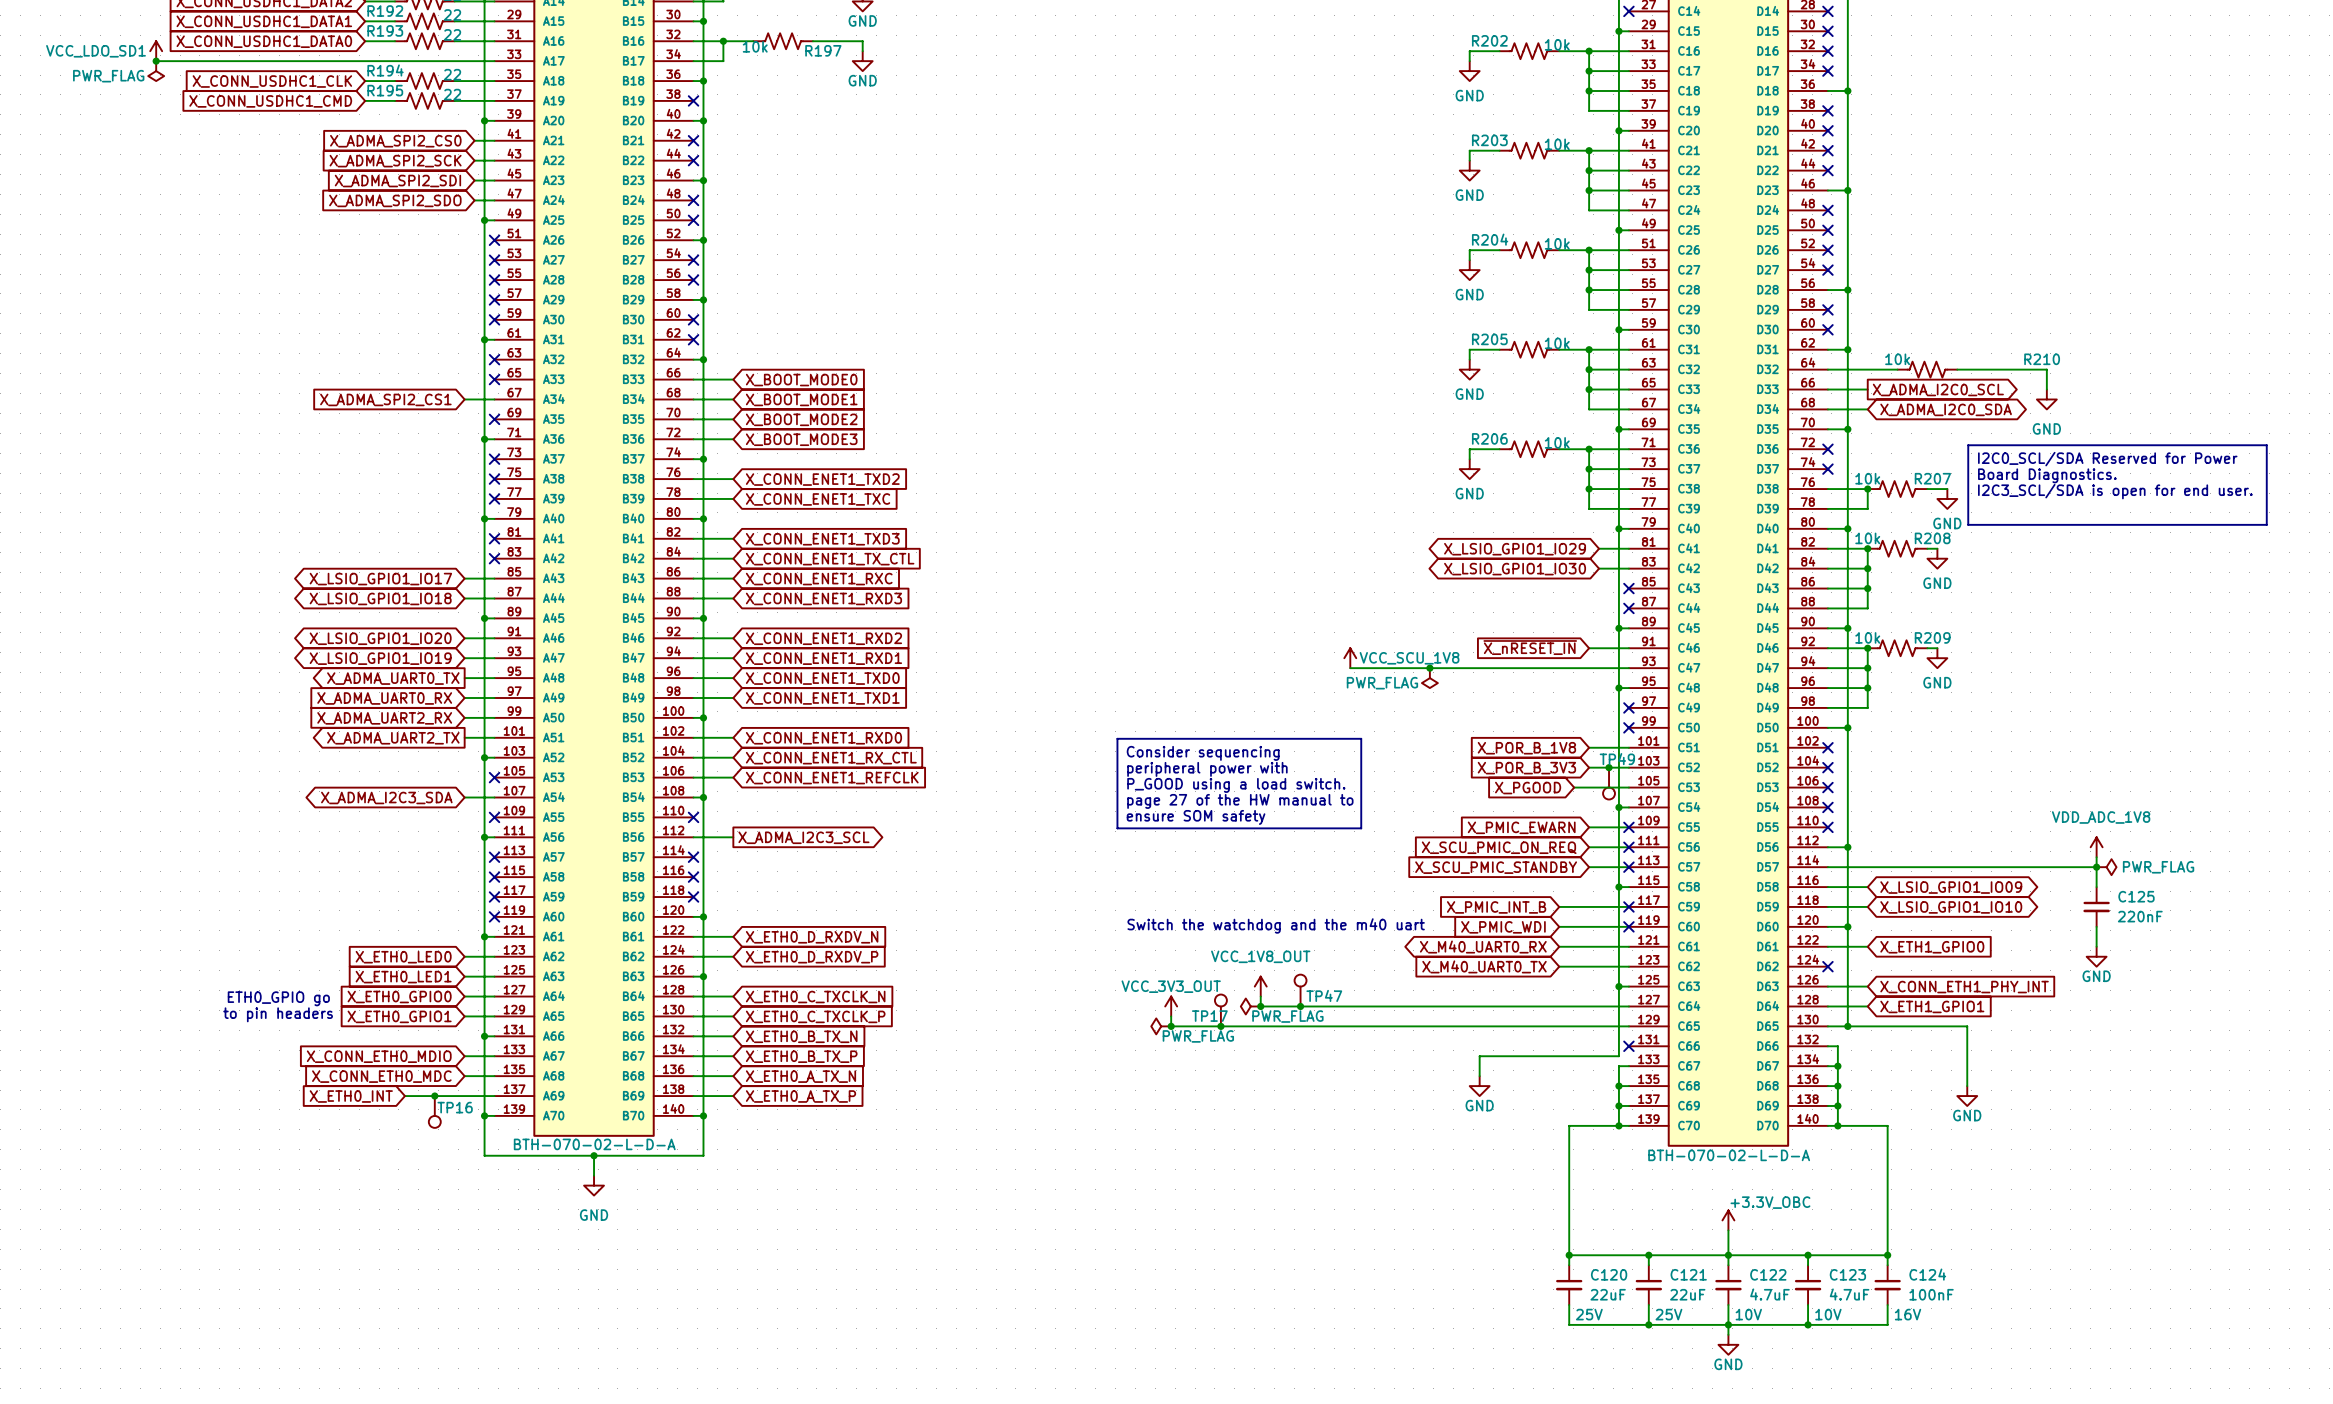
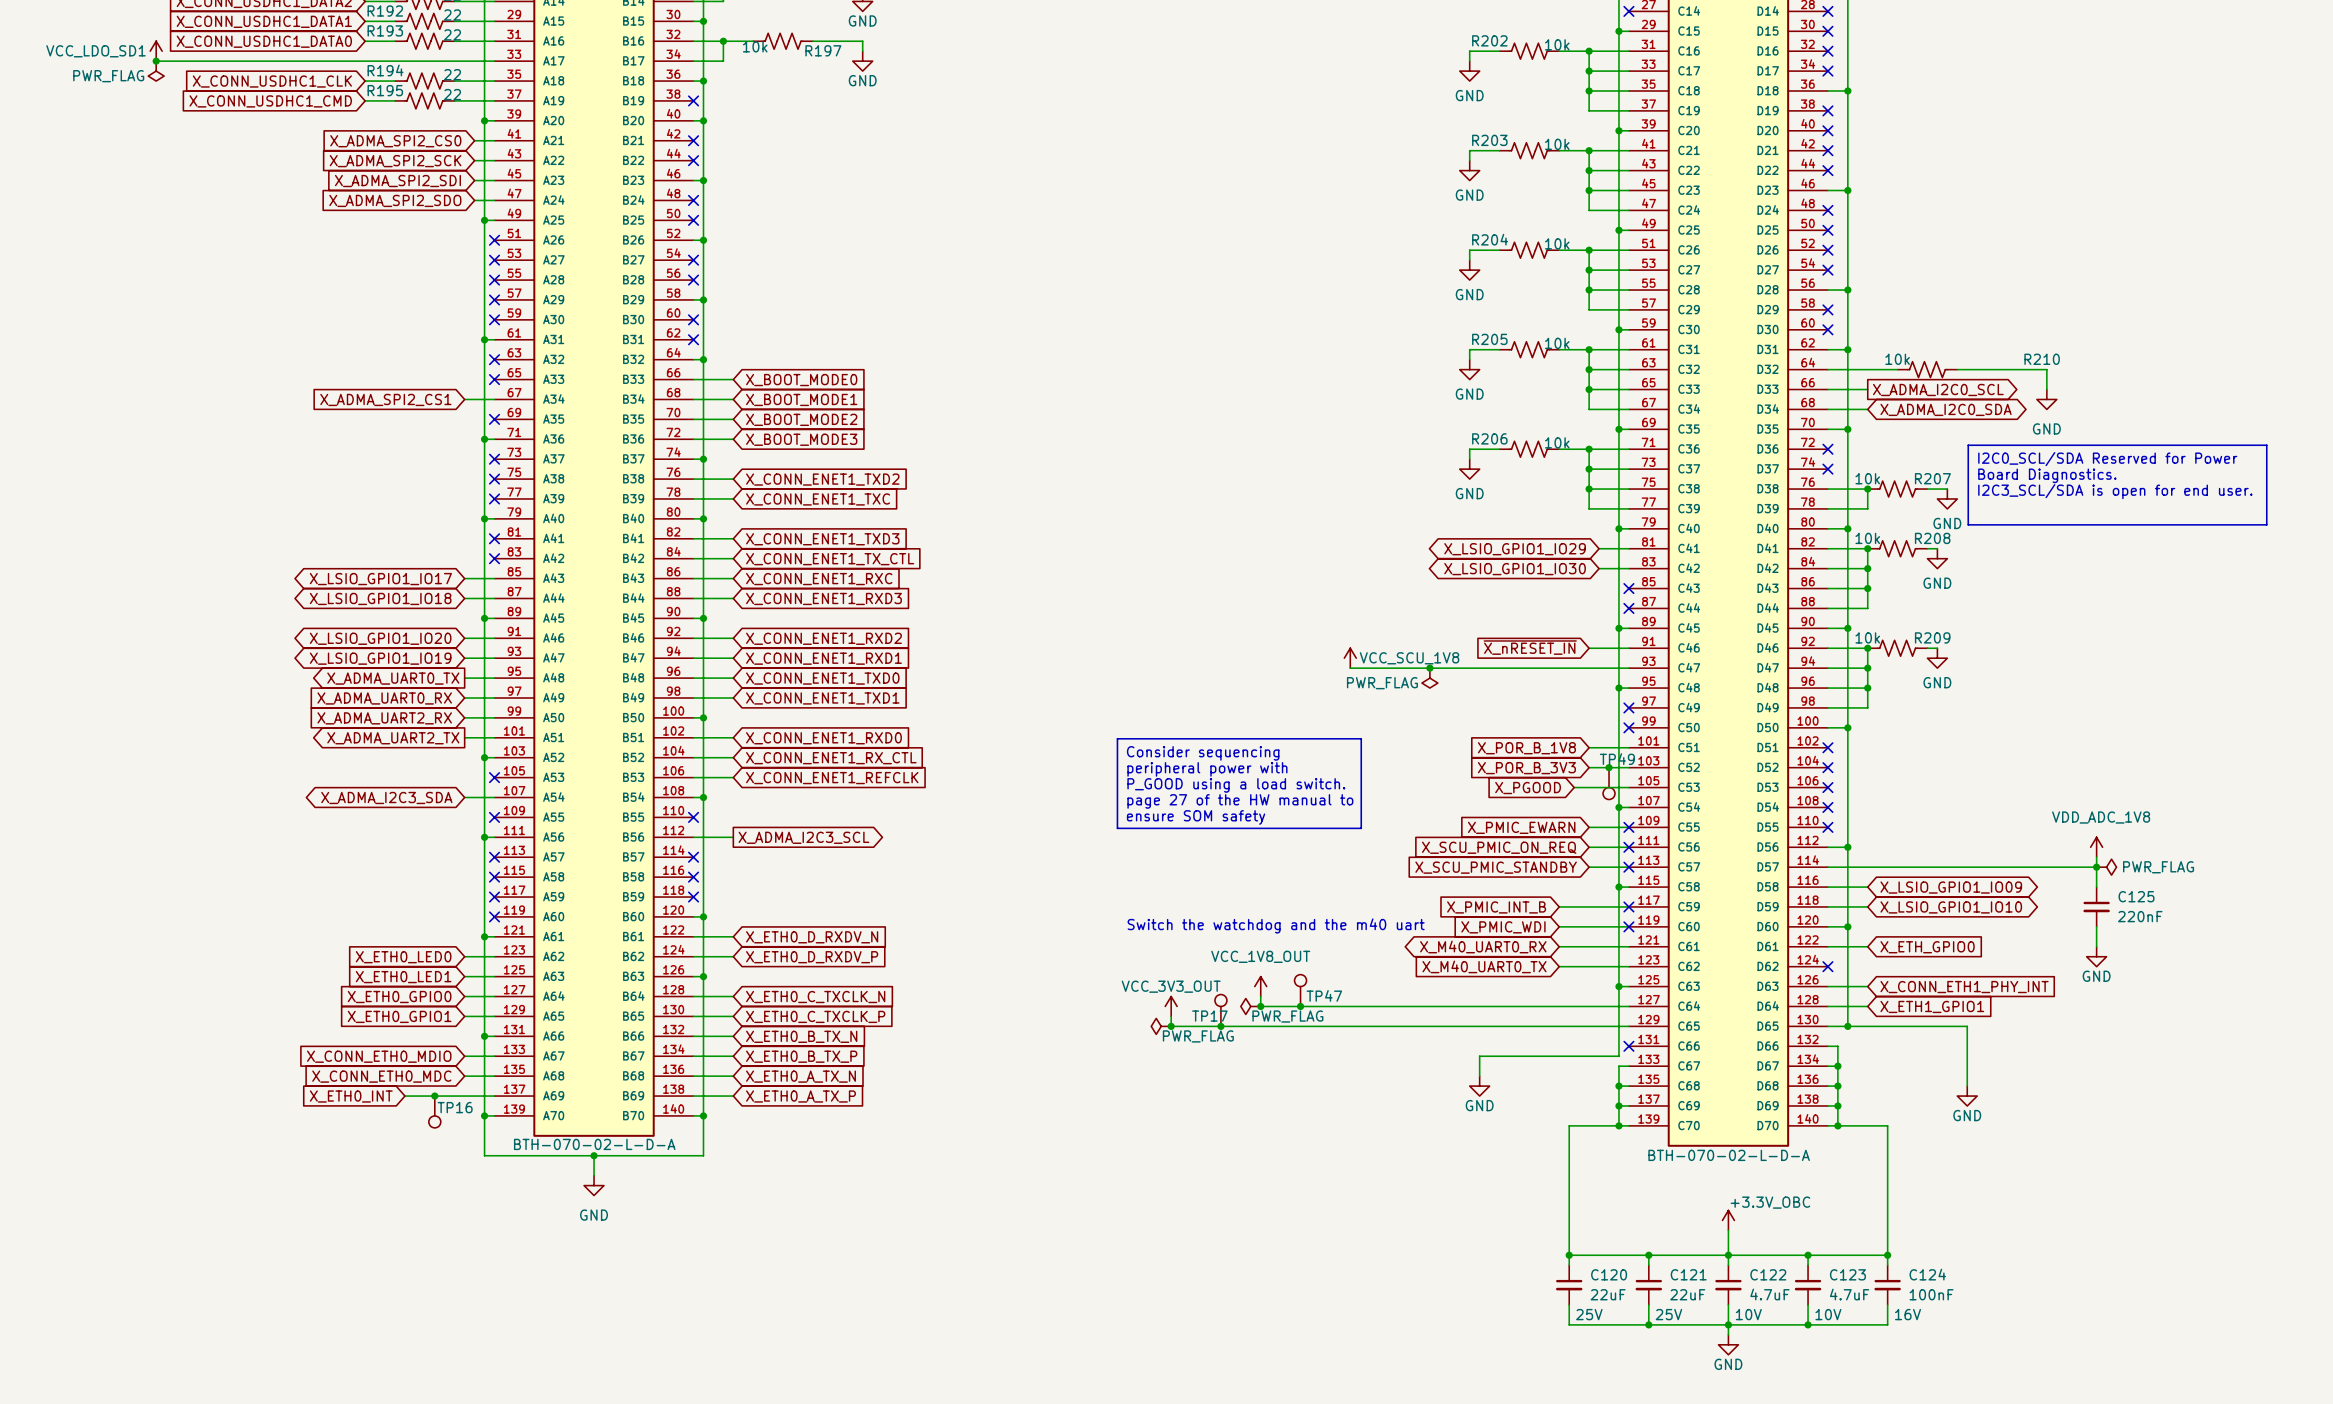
global label: X_ETH1_GPIO0 (1932, 947) -> X_ETH_GPIO0 (1927, 947)
text: ETH0_GPIO go (278, 998) -> none
text: to pin headers (278, 1014) -> none

